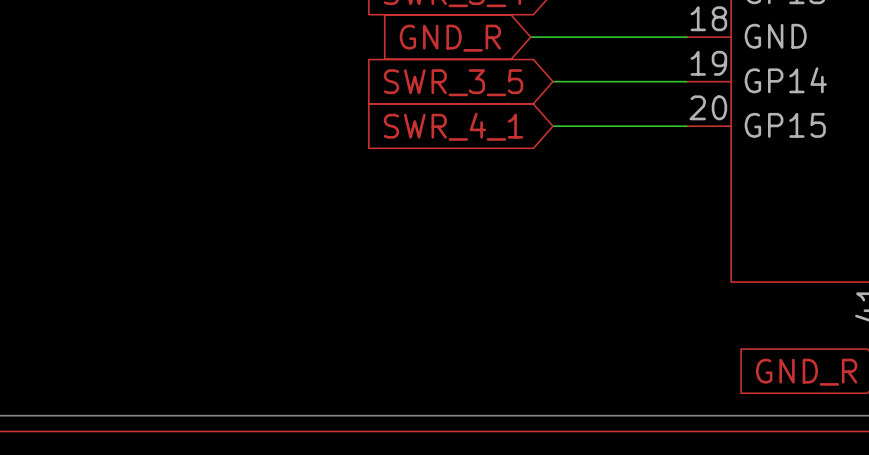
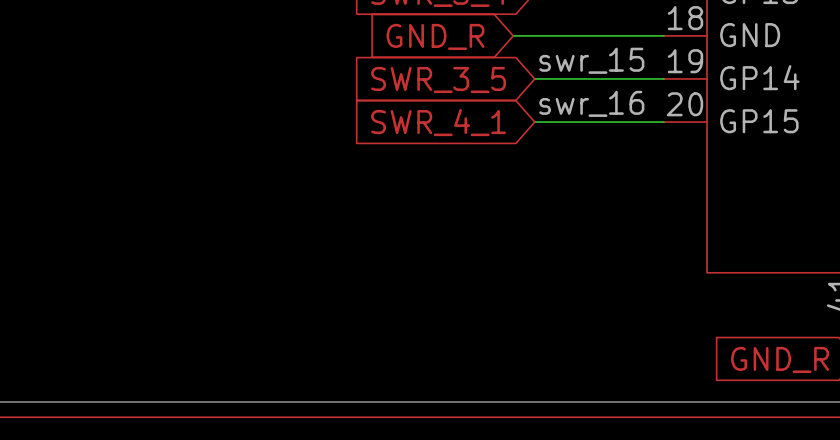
label: none -> swr_15 (591, 60)
label: none -> swr_16 (591, 103)

